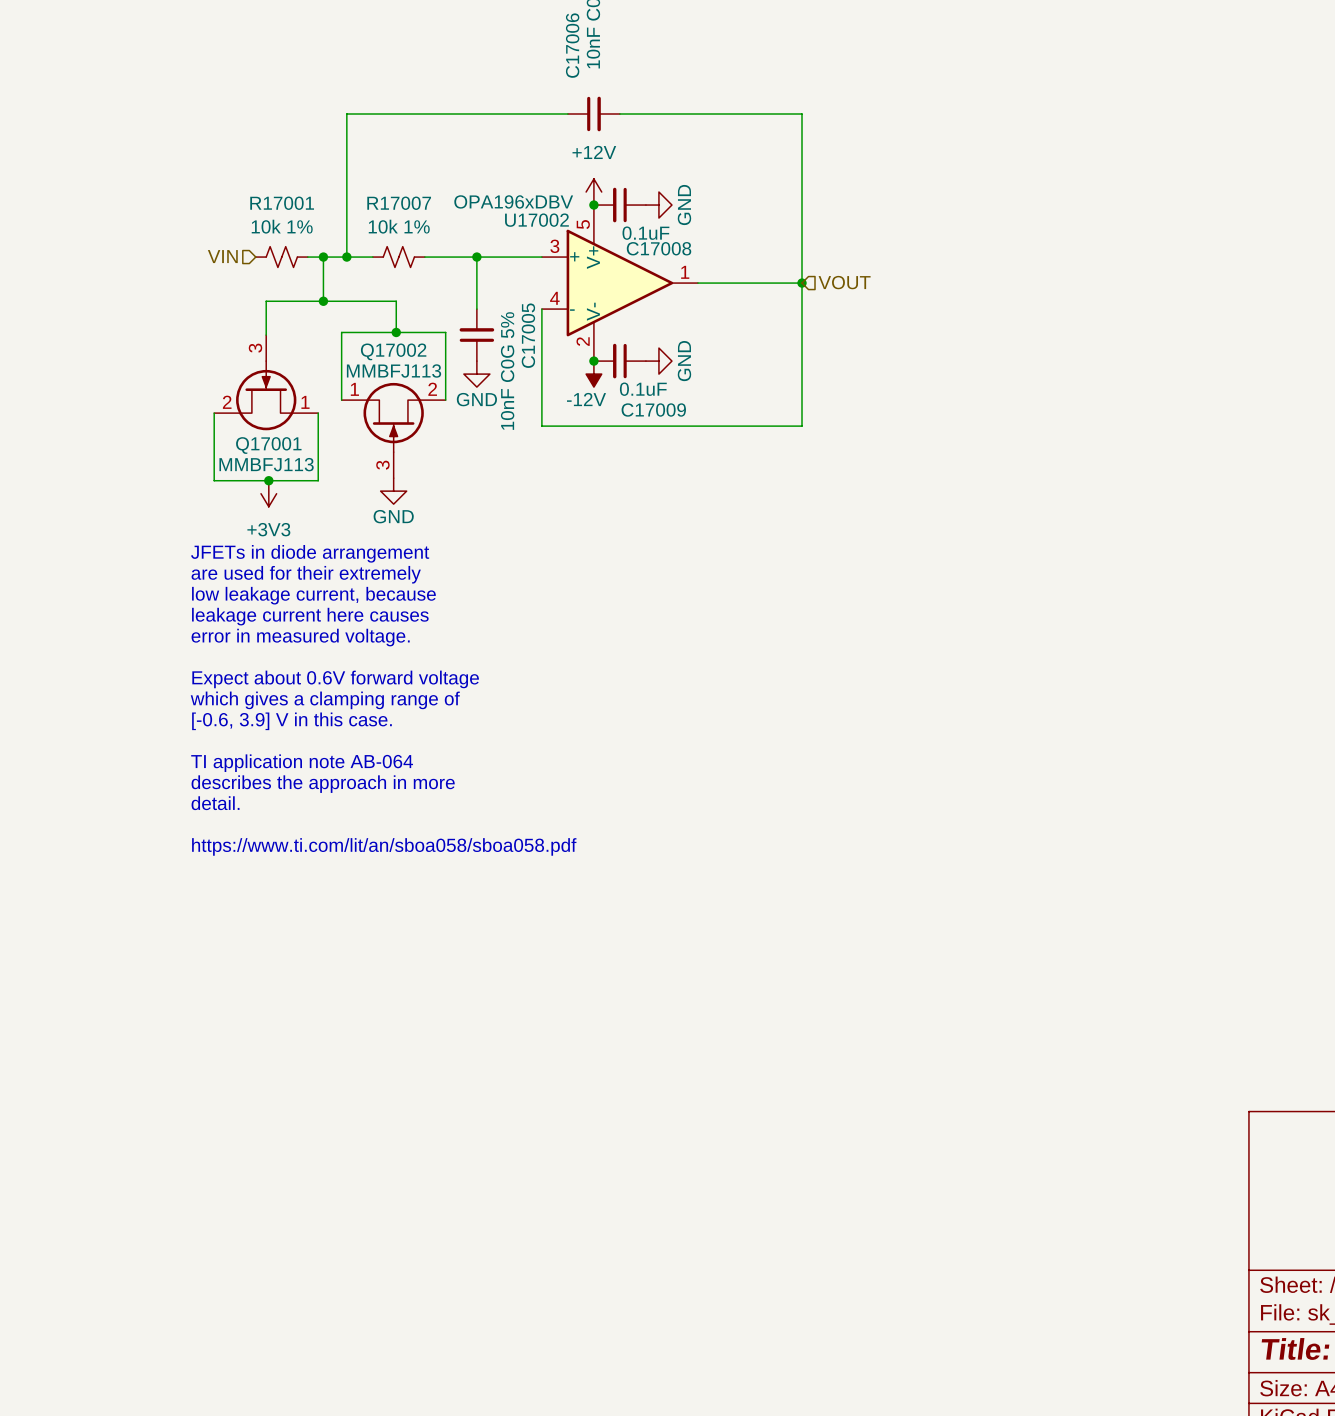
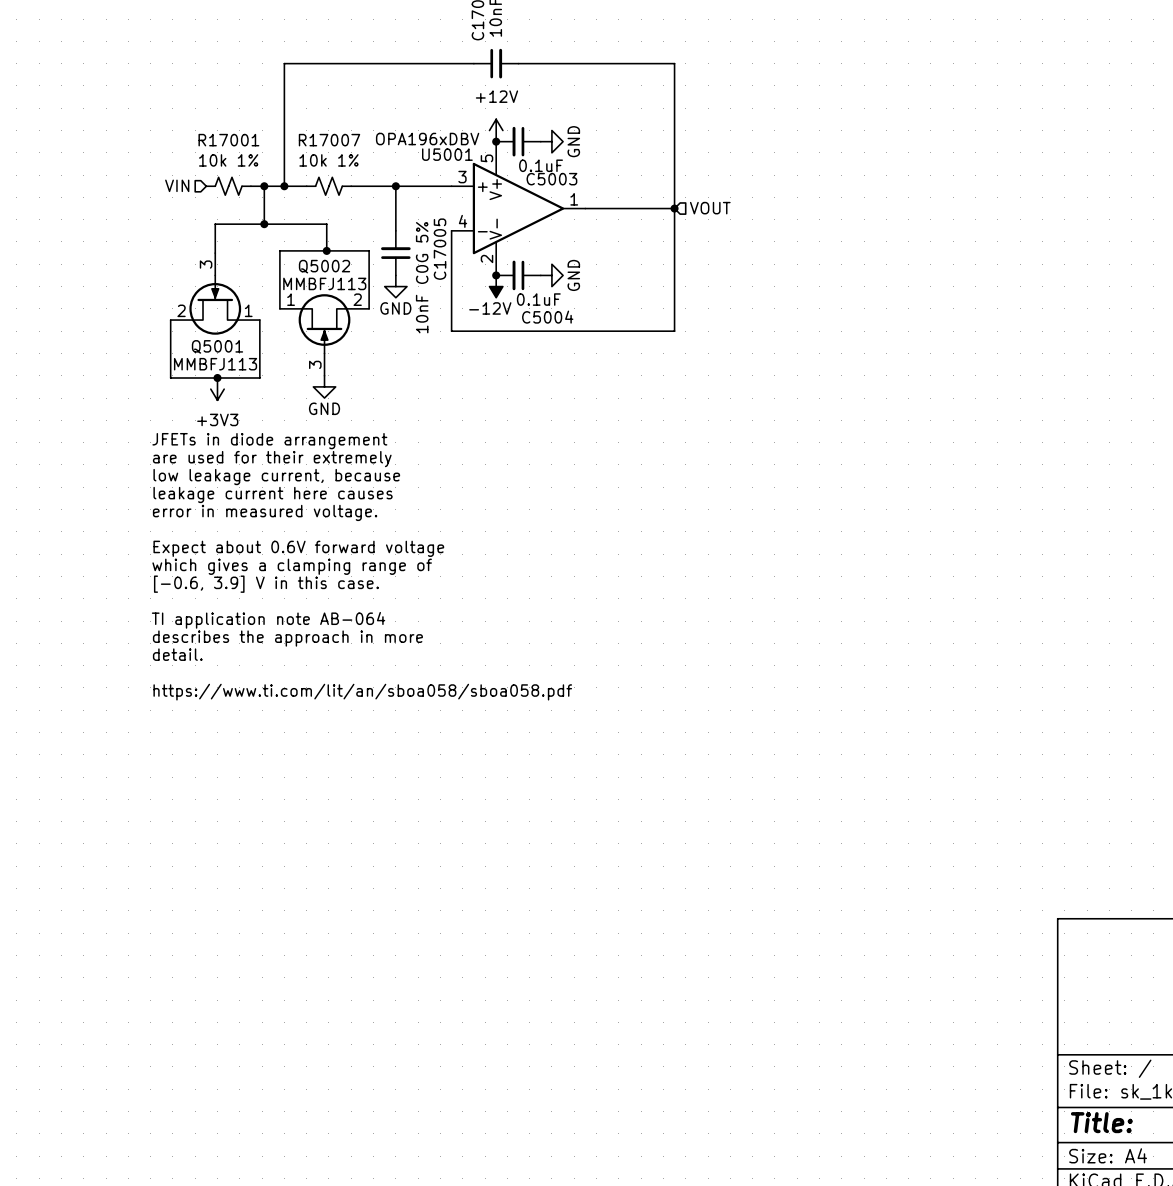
U17002 name: U17002 (536, 220) -> U5001 (447, 154)
C17008 name: C17008 (659, 248) -> C5003 (551, 179)
Q17002 name: Q17002 (393, 351) -> Q5002 (324, 266)
C17009 name: C17009 (653, 410) -> C5004 (547, 317)
Q17001 name: Q17001 (268, 445) -> Q5001 (217, 346)

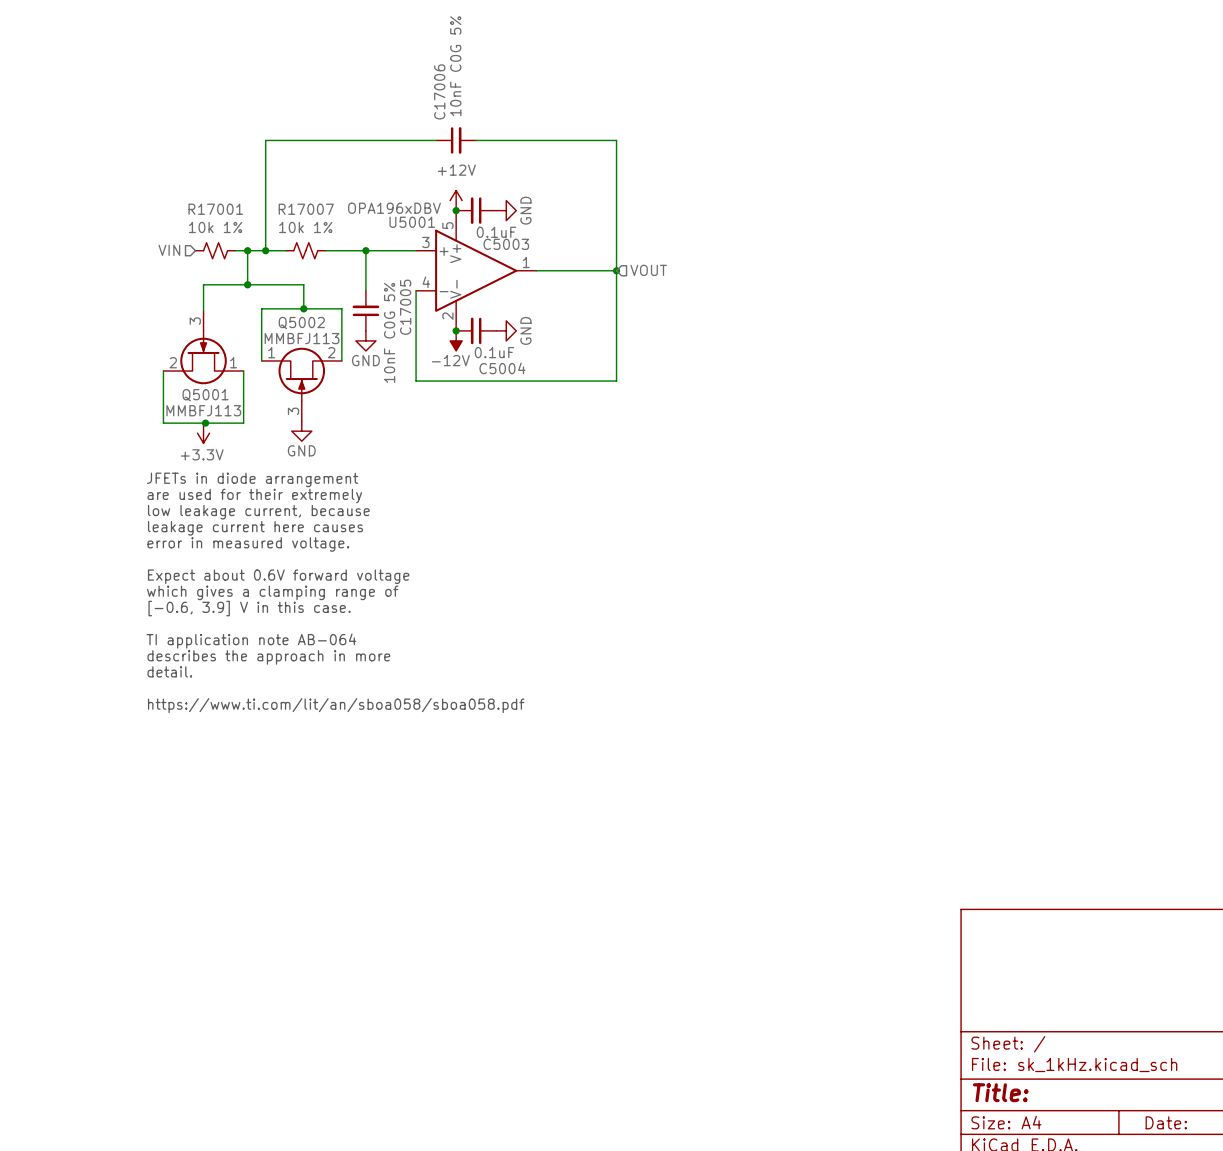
power symbol: +3V3 (217, 389) -> +3.3V (203, 433)

